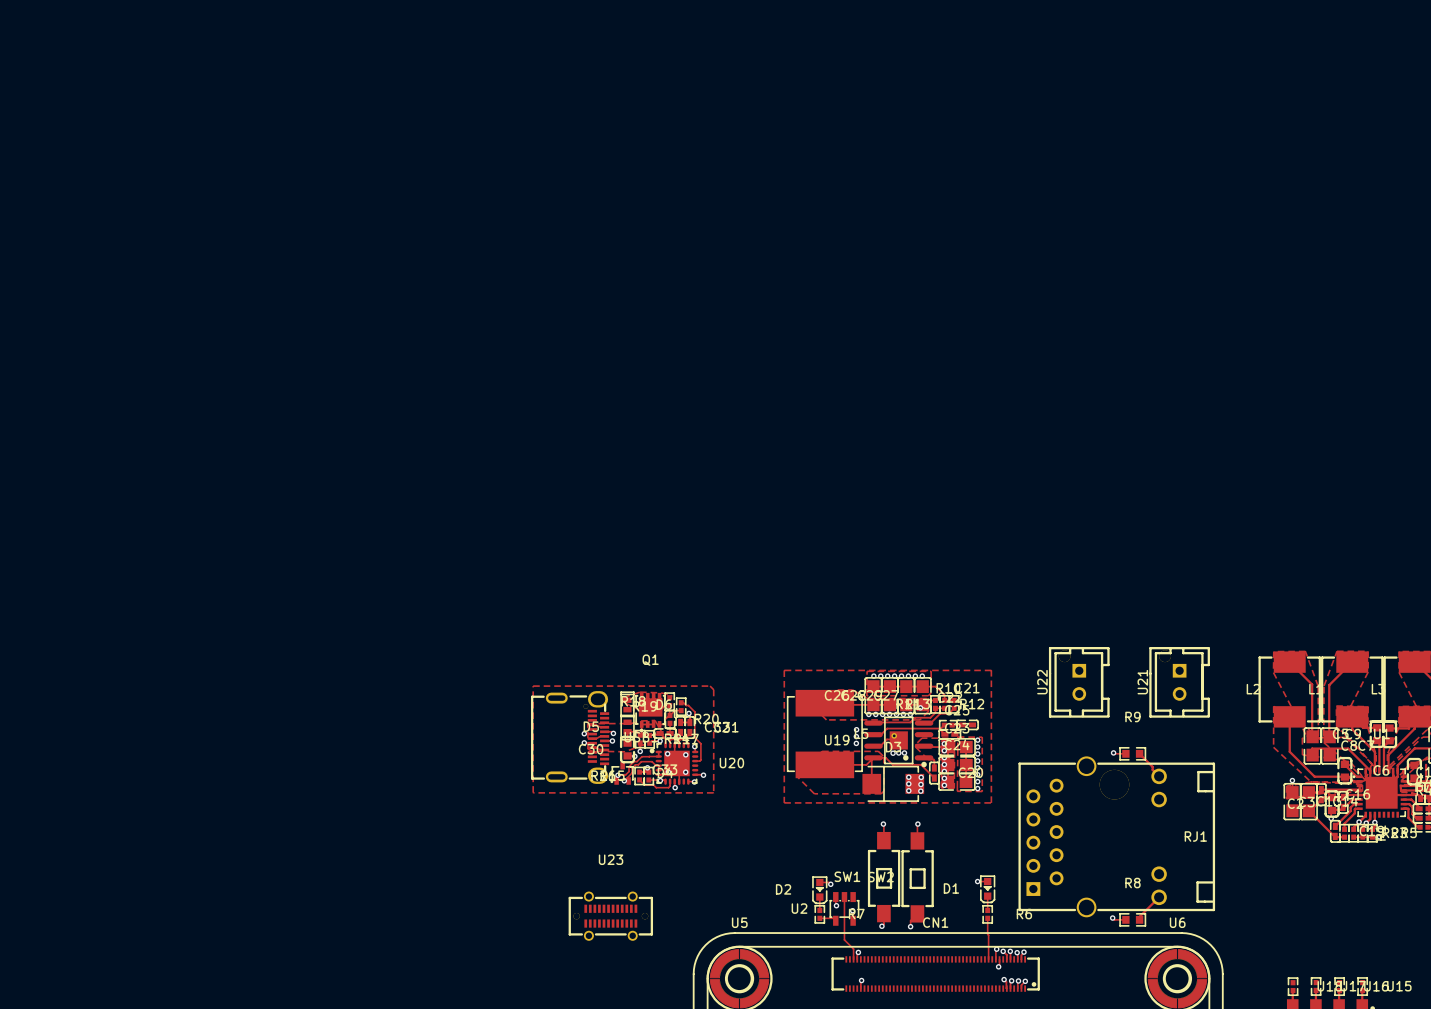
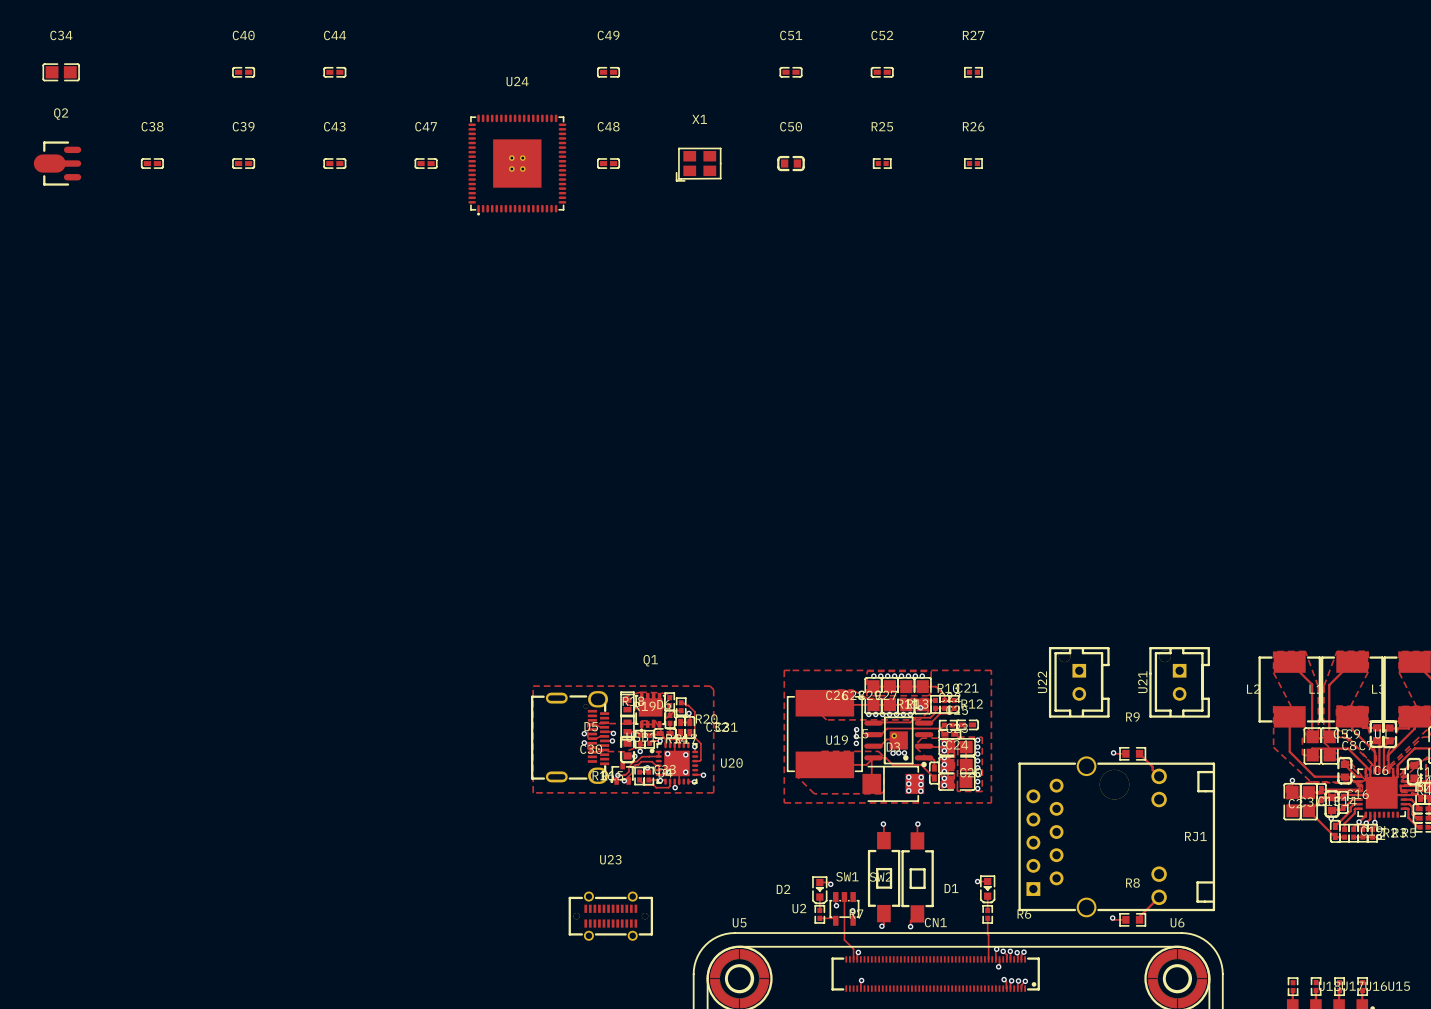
C34: none -> (61, 72)
C40: none -> (243, 72)
C44: none -> (334, 72)
C49: none -> (608, 72)
C51: none -> (791, 72)
C52: none -> (882, 72)
R27: none -> (973, 72)
Q2: none -> (57, 163)
C38: none -> (152, 163)
C39: none -> (243, 163)
C43: none -> (334, 163)
C47: none -> (426, 163)
C48: none -> (608, 163)
C50: none -> (791, 163)
R25: none -> (882, 163)
R26: none -> (973, 163)
U24: none -> (517, 164)
X1: none -> (698, 164)

